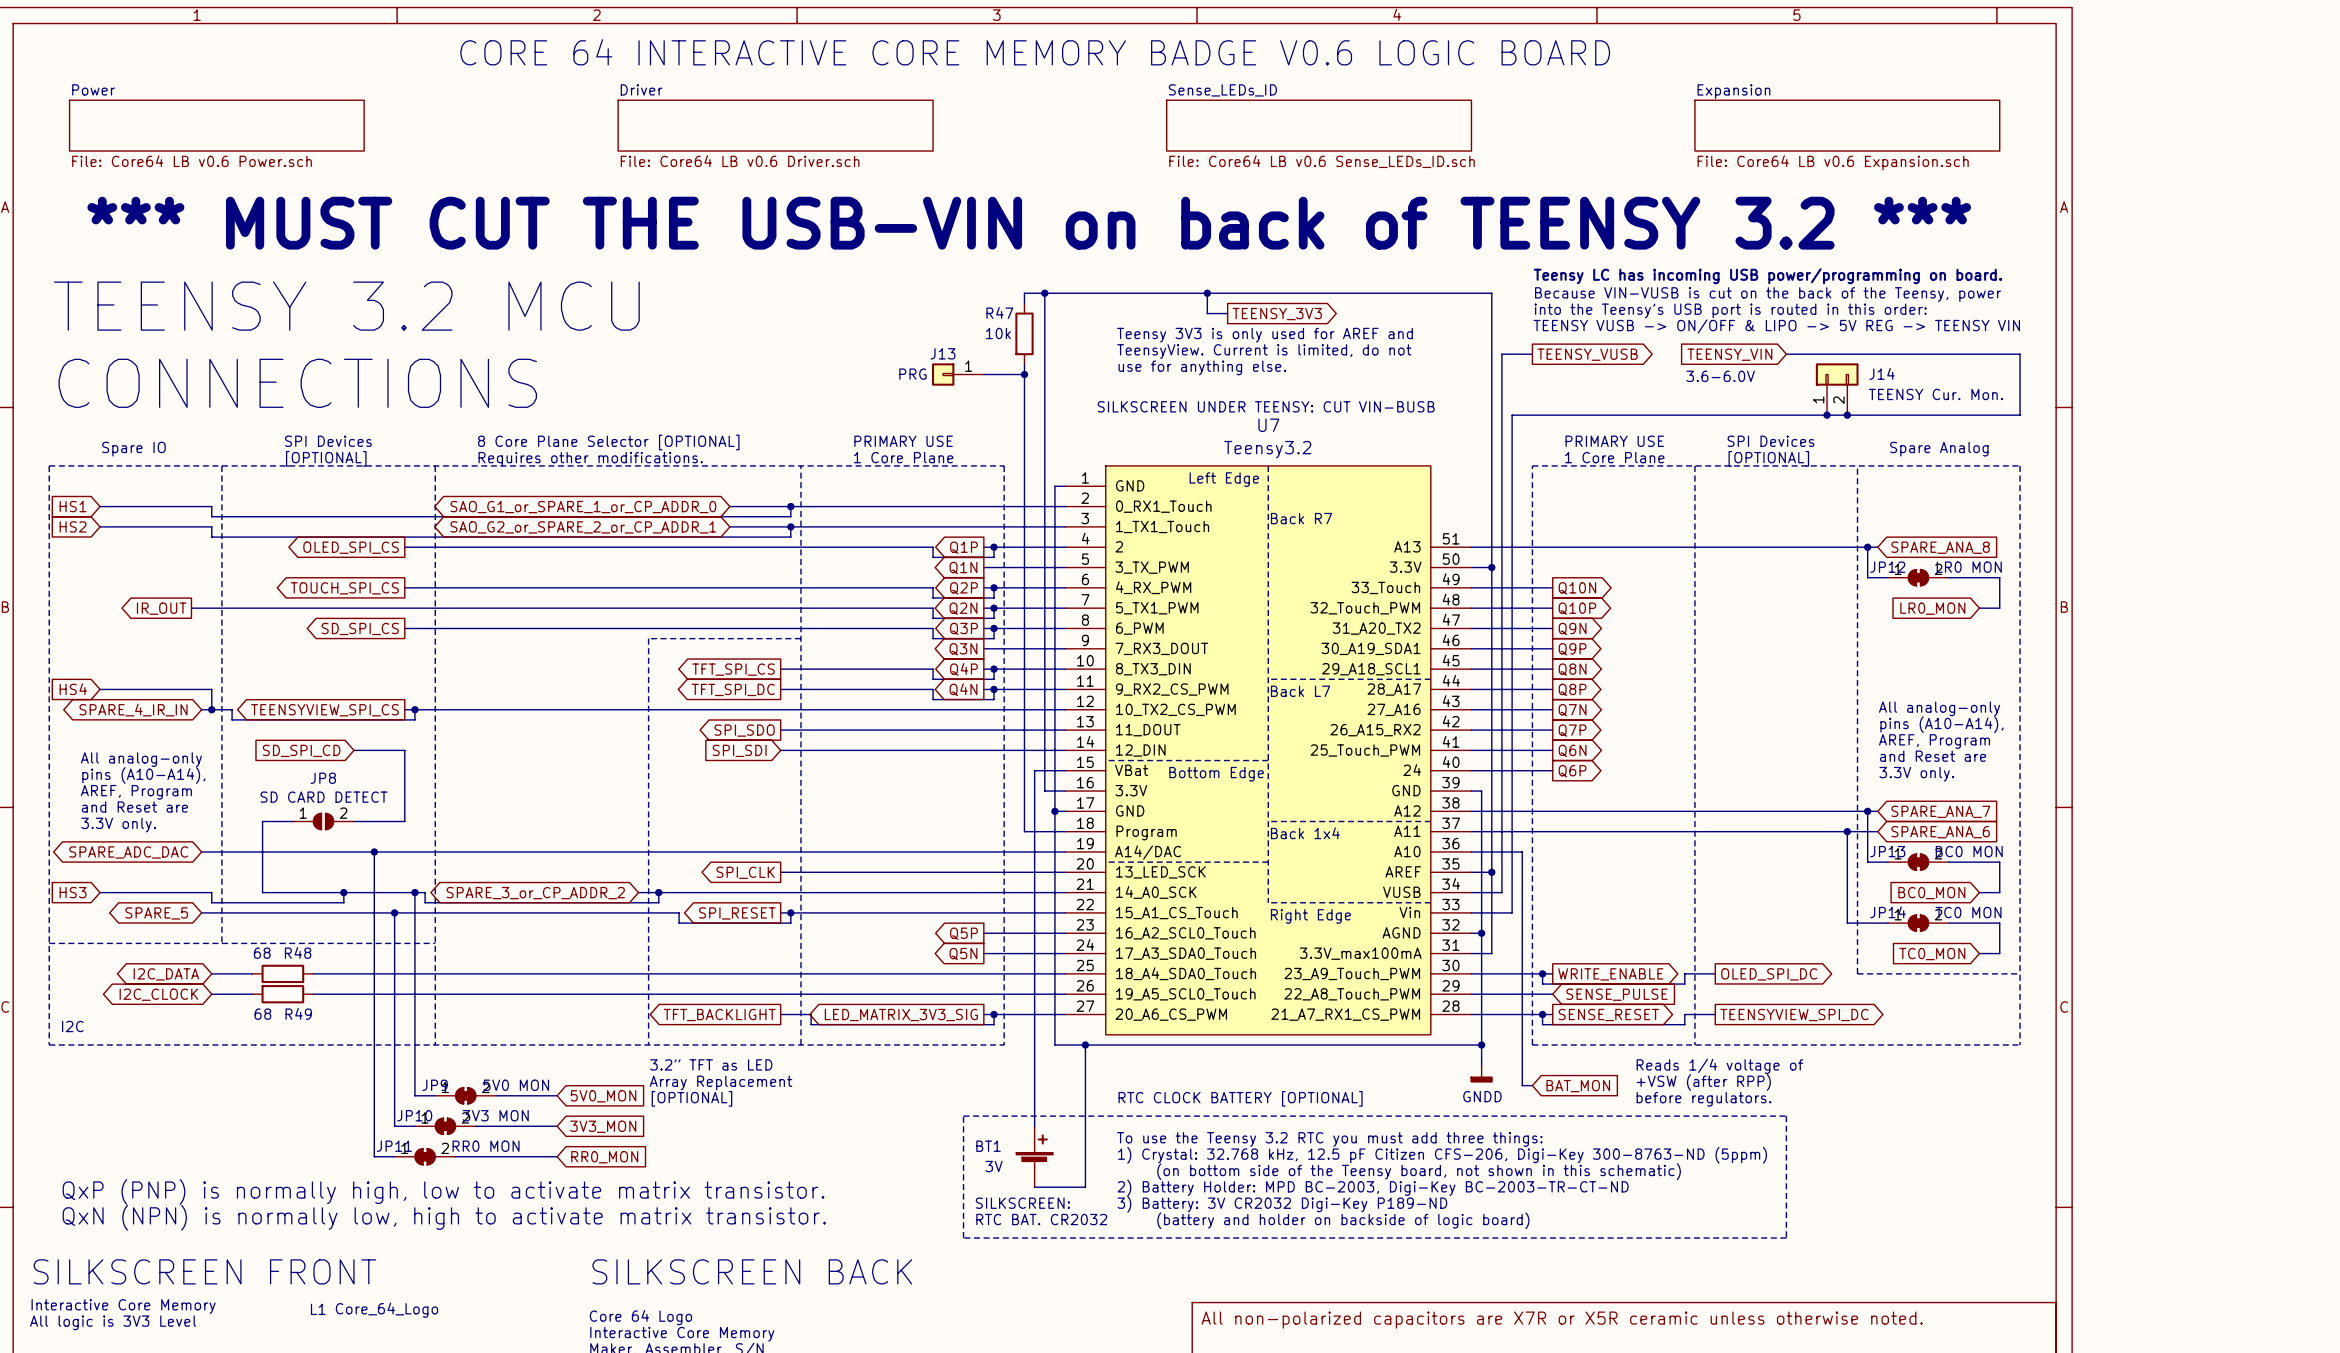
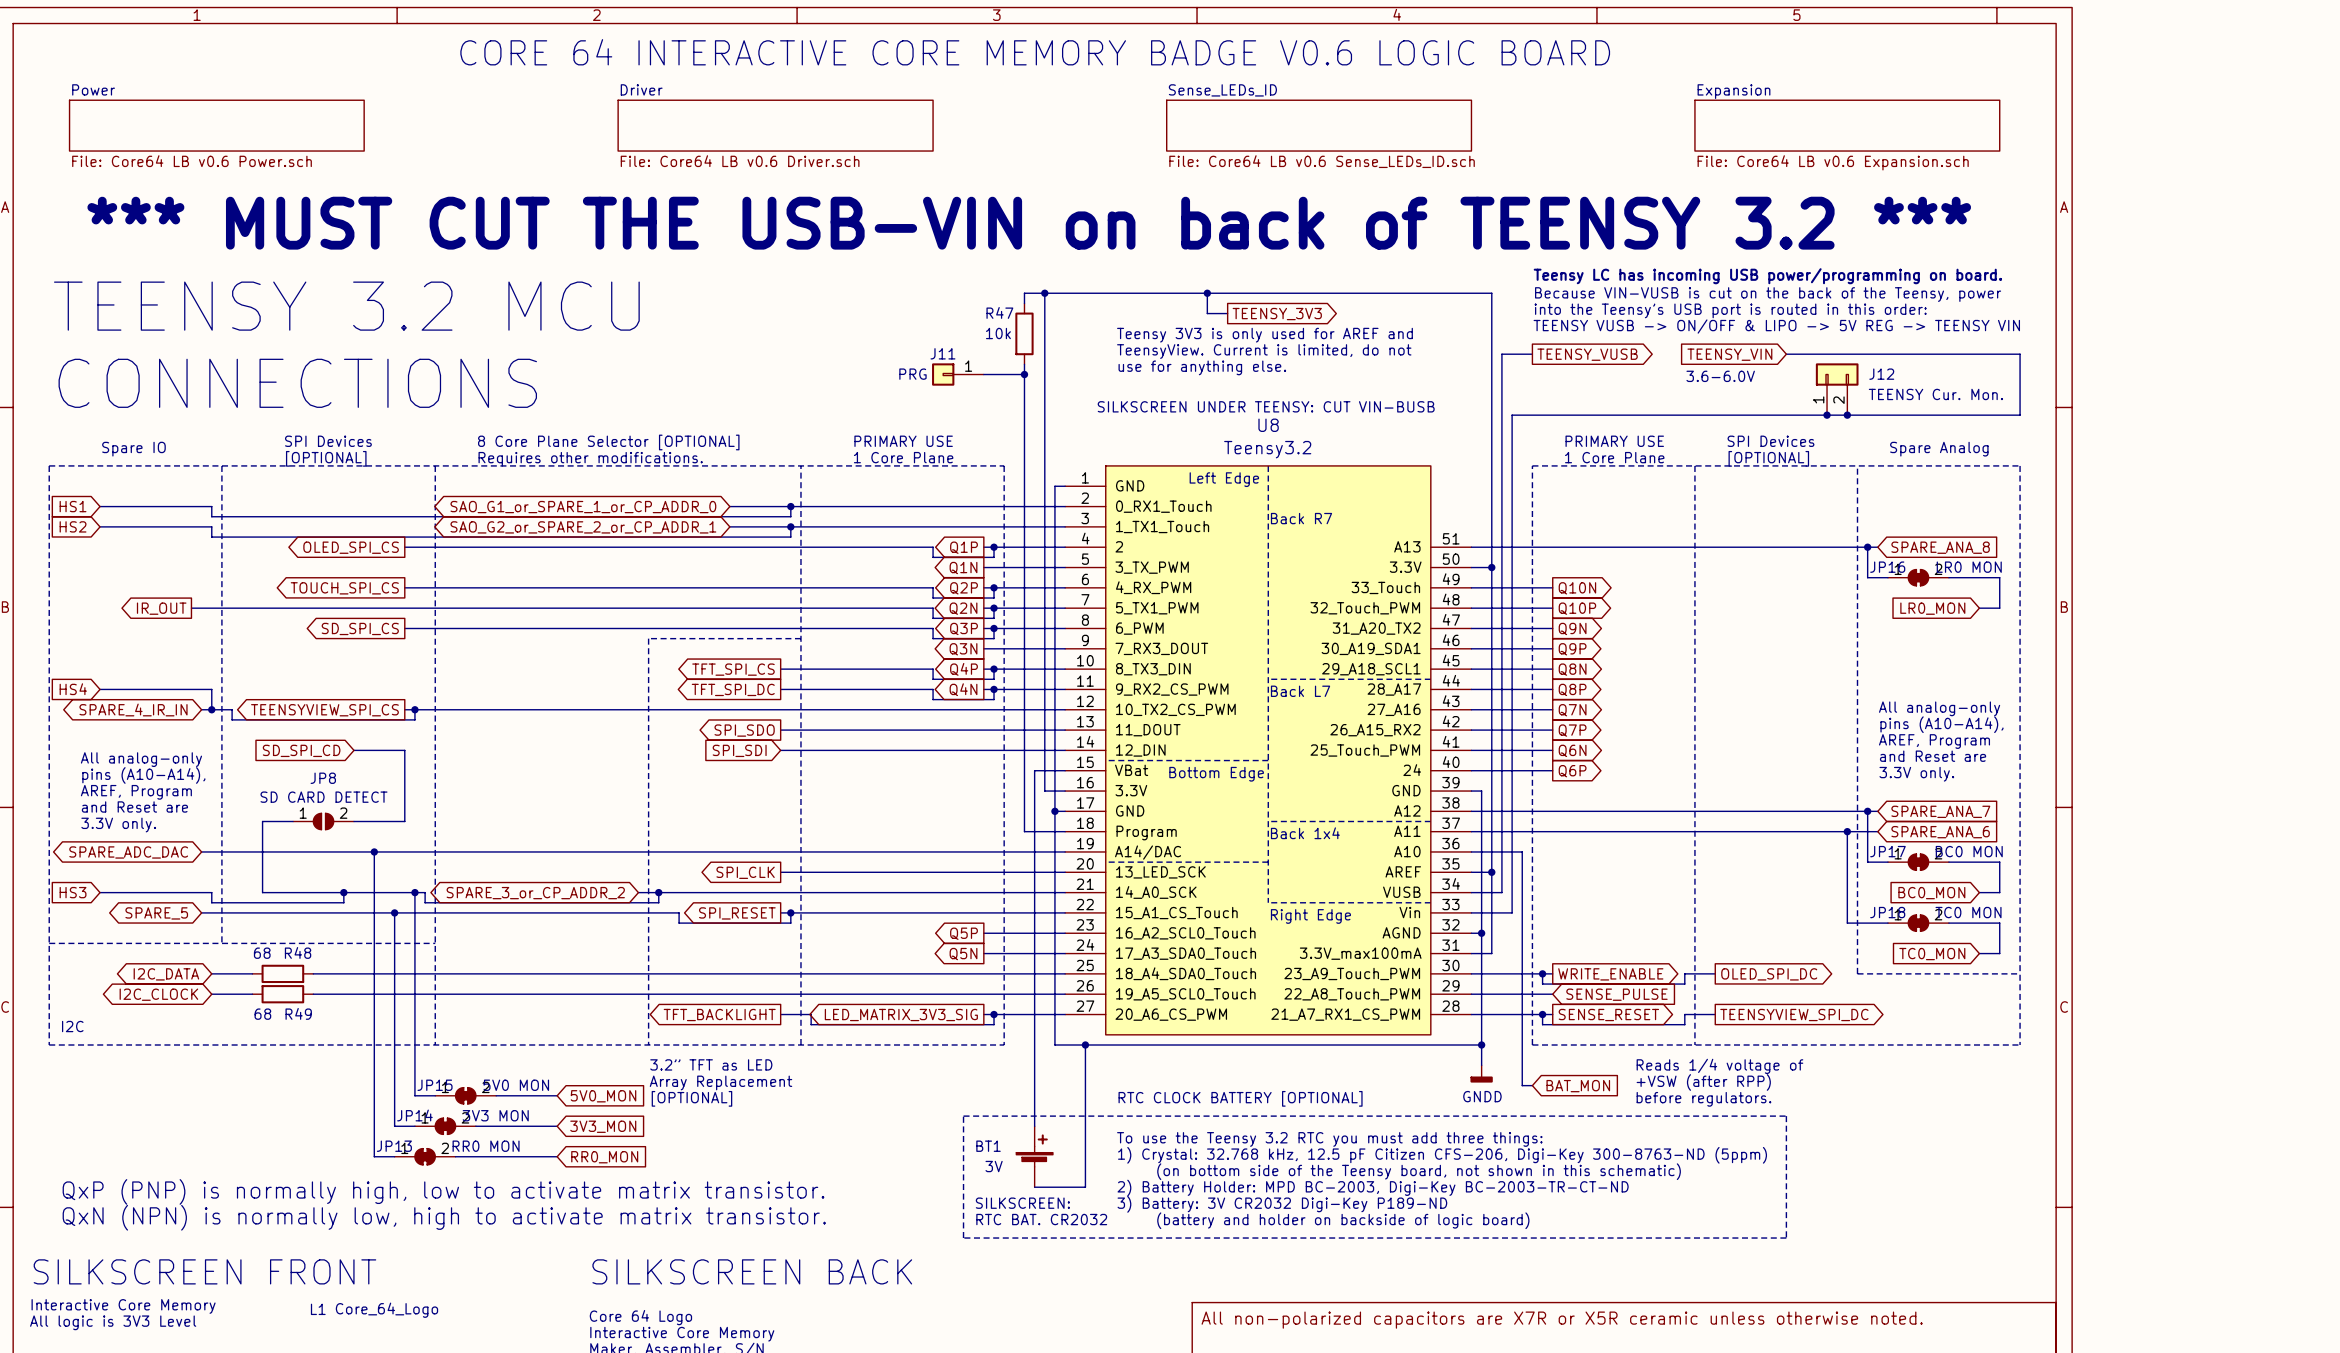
J13 name: J13 (942, 353) -> J11 (942, 353)
J14 name: J14 (1882, 373) -> J12 (1881, 374)
U7 name: U7 (1268, 425) -> U8 (1268, 425)
JP12 name: JP12 (1887, 567) -> JP16 (1887, 567)
JP13 name: JP13 (1887, 851) -> JP17 (1887, 851)
JP14 name: JP14 (1887, 912) -> JP18 (1887, 912)
JP9 name: JP9 (435, 1085) -> JP15 (435, 1085)
JP10 name: JP10 (414, 1115) -> JP14 (414, 1115)
JP11 name: JP11 (394, 1146) -> JP13 (394, 1146)

